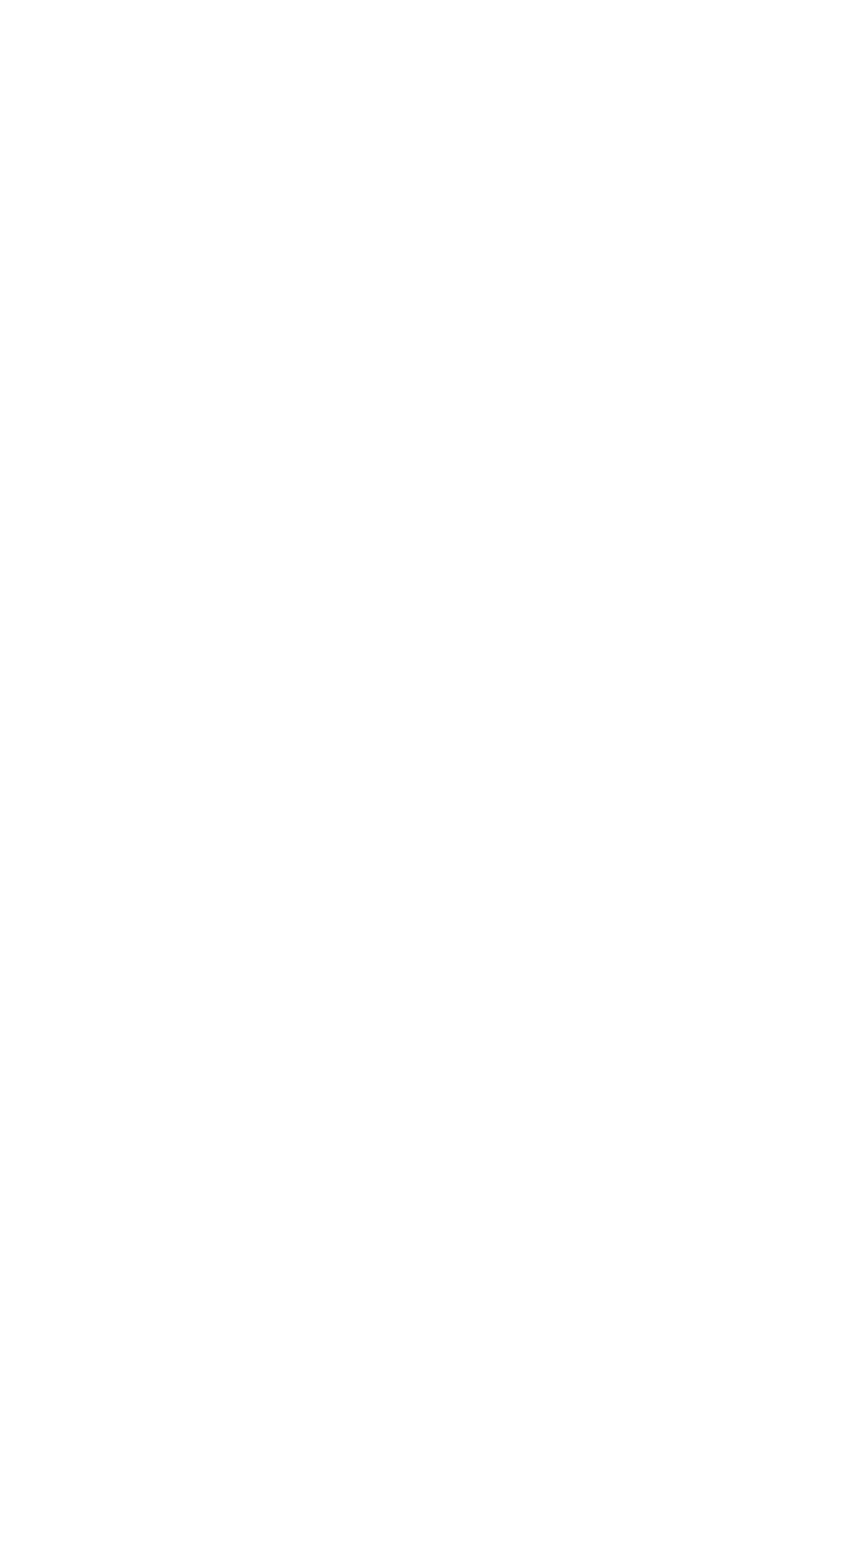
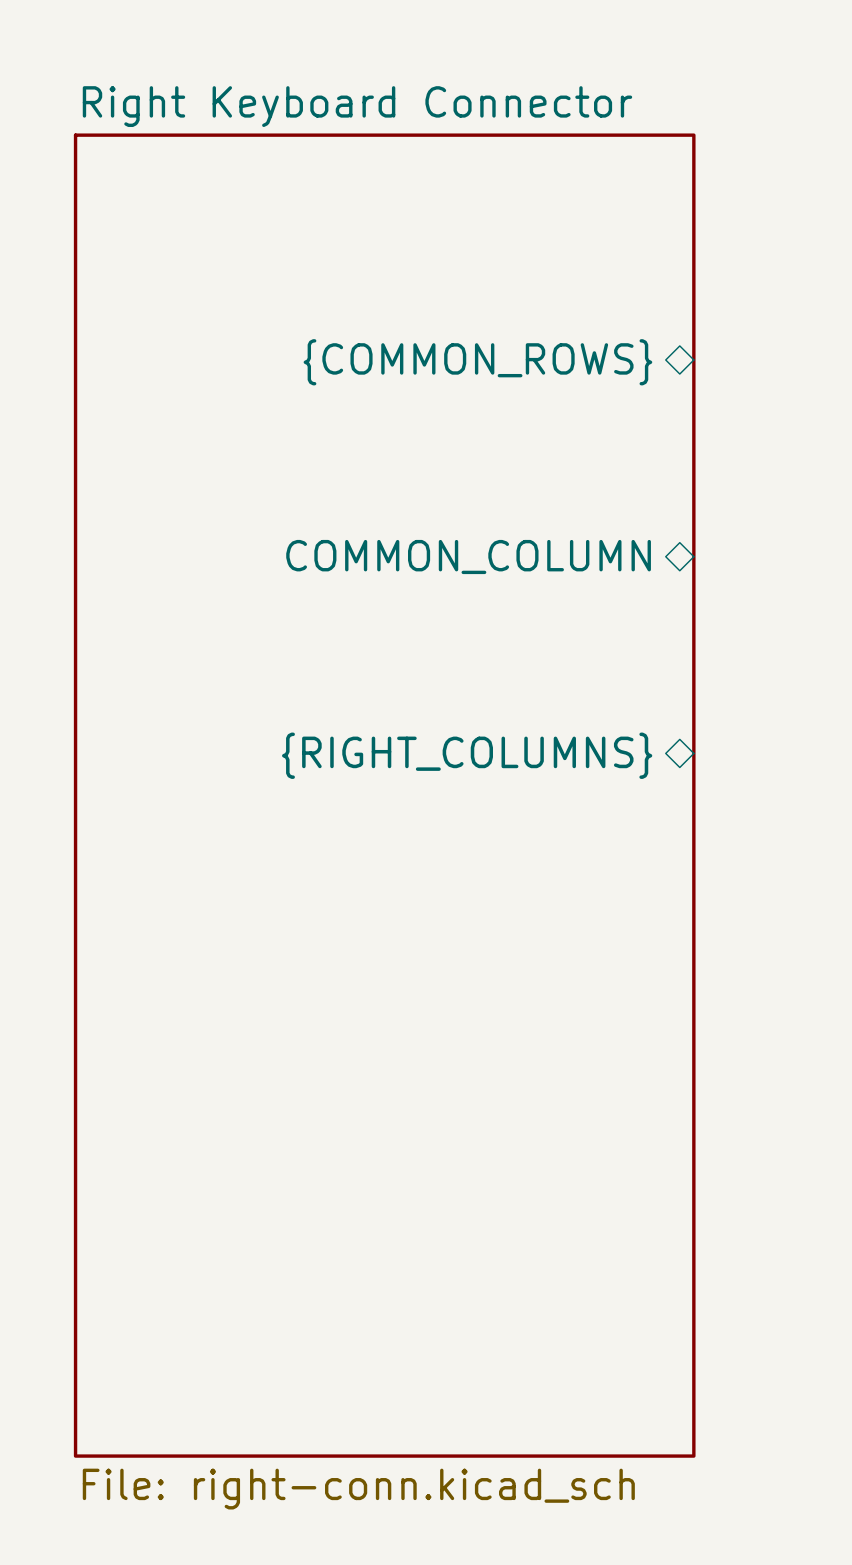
sheet pin: none -> {COMMON_ROWS} (477, 362)
sheet pin: none -> COMMON_COLUMN (468, 557)
sheet pin: none -> {RIGHT_COLUMNS} (467, 755)
sheet Right Keyboard Connector: none -> File: right-conn.kicad_sch (384, 795)

